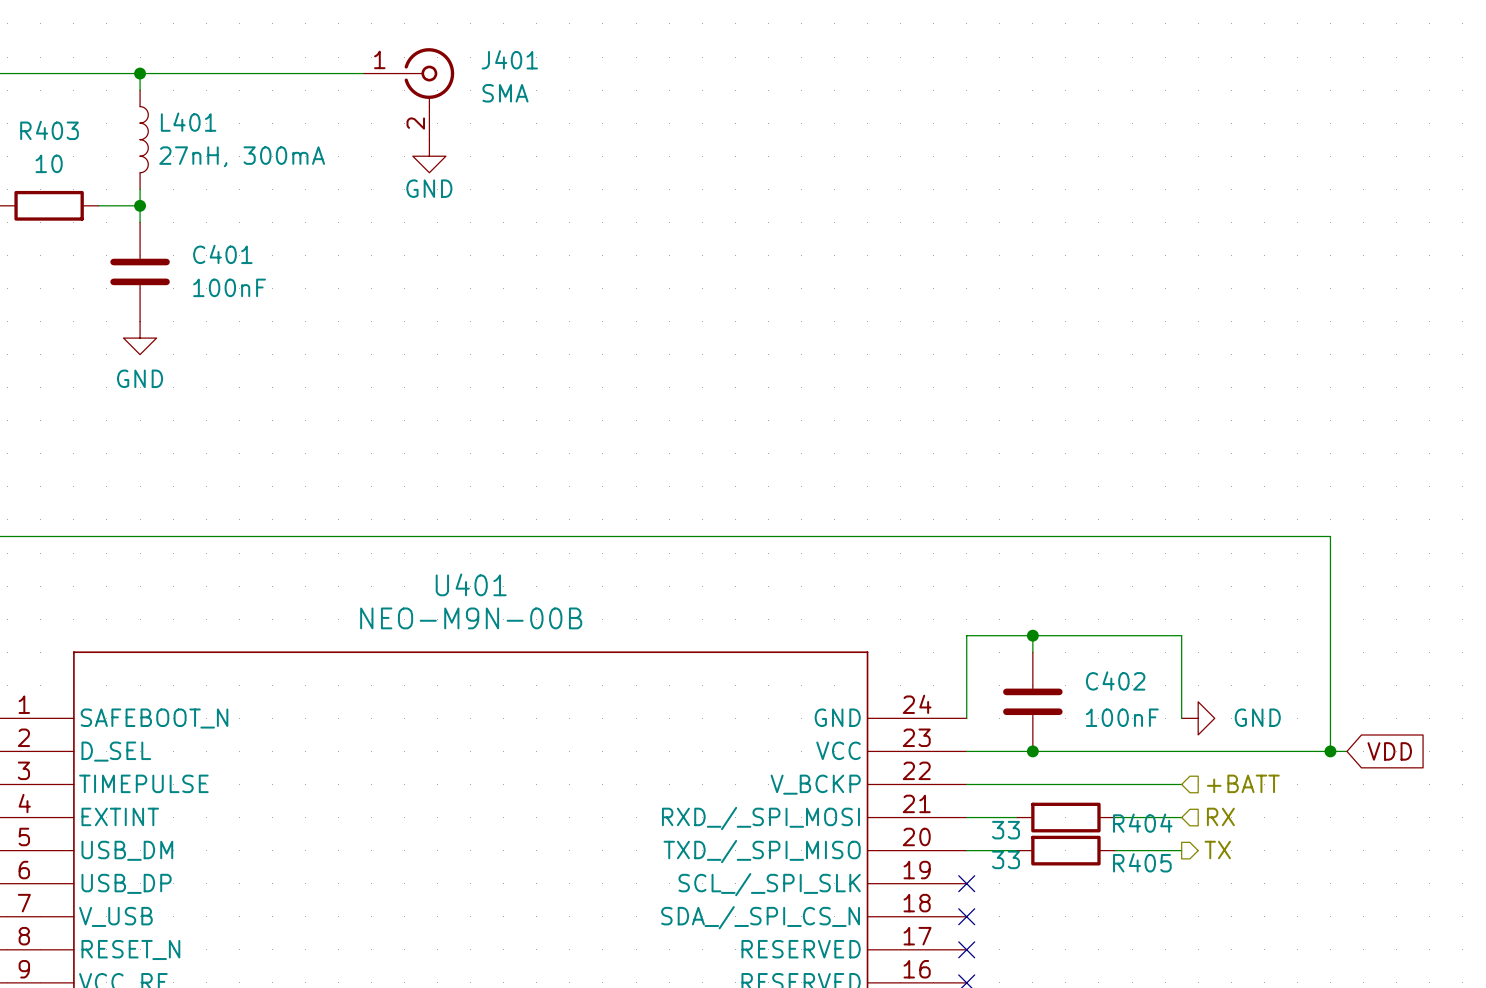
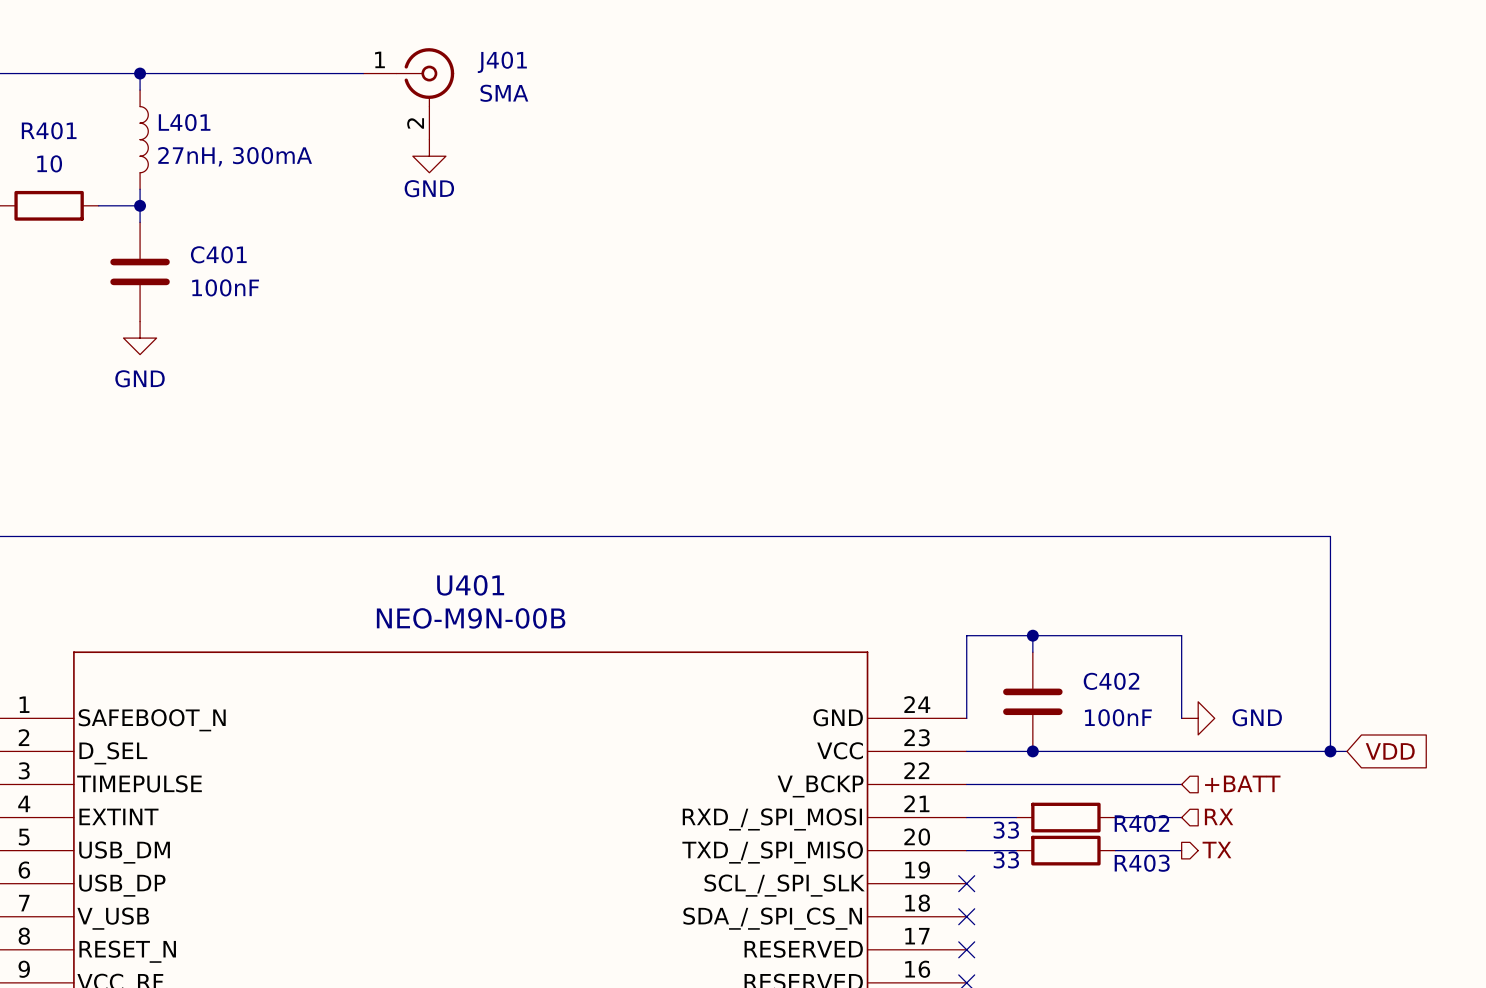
R403 name: R403 (49, 130) -> R401 (49, 130)
R404 name: R404 (1142, 823) -> R402 (1141, 823)
R405 name: R405 (1142, 862) -> R403 (1142, 863)

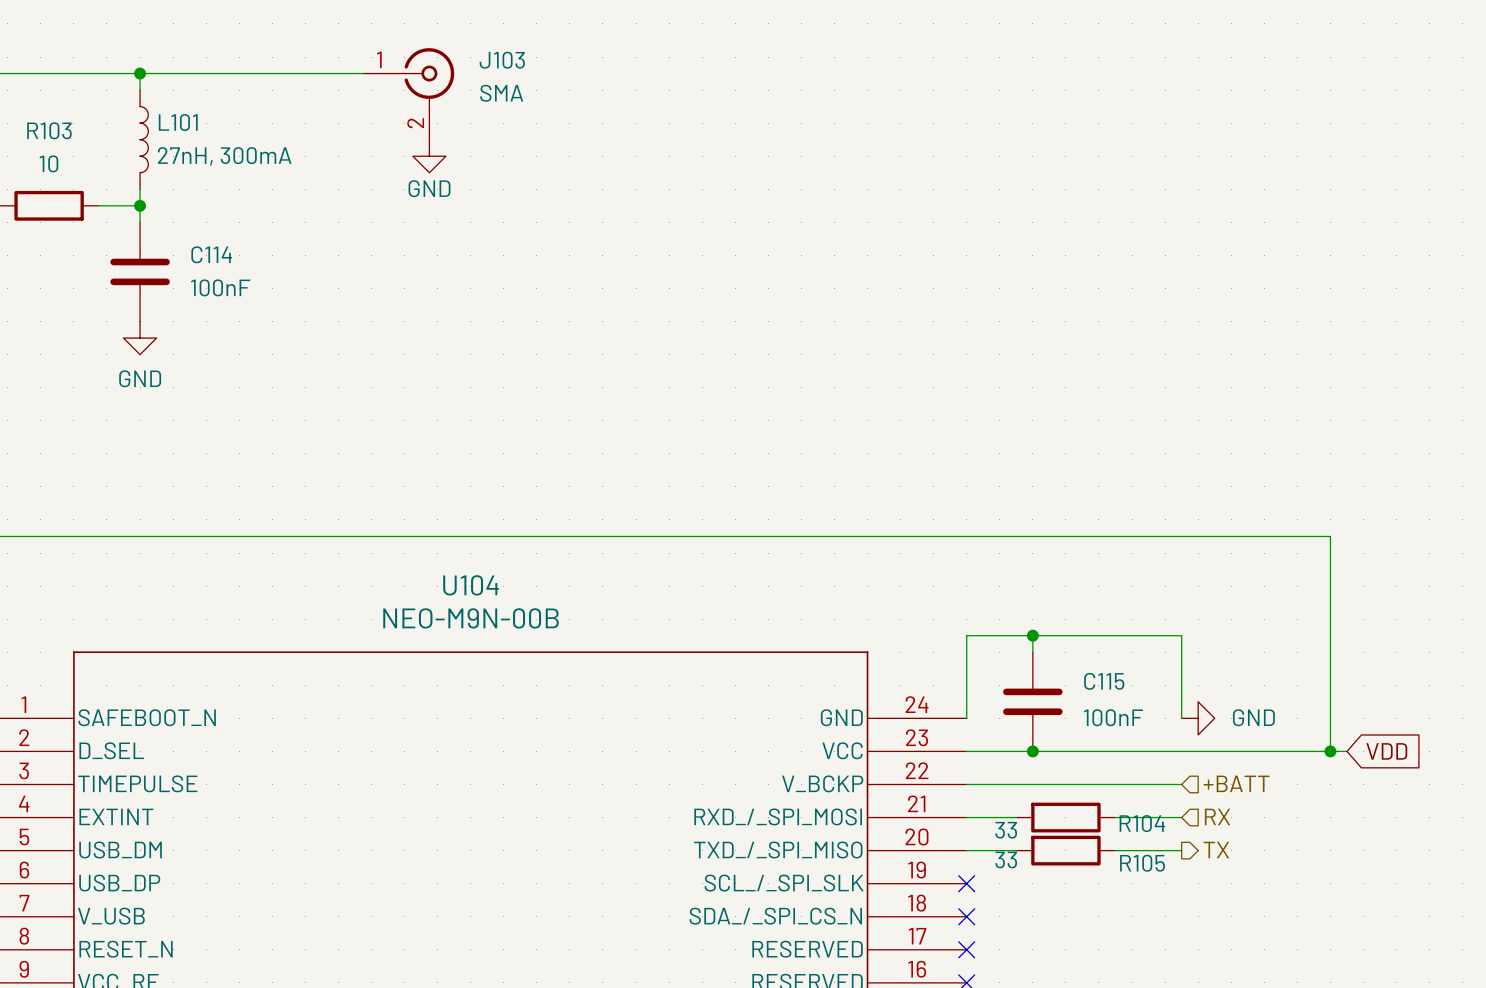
J401 name: J401 (502, 62) -> J103 (502, 60)
L401 name: L401 (184, 122) -> L101 (178, 122)
R401 name: R401 (49, 130) -> R103 (49, 130)
C401 name: C401 (218, 254) -> C114 (211, 254)
U401 name: U401 (470, 585) -> U104 (471, 585)
C402 name: C402 (1111, 681) -> C115 (1104, 681)
R402 name: R402 (1141, 823) -> R104 (1142, 823)
R403 name: R403 (1142, 863) -> R105 (1142, 863)

